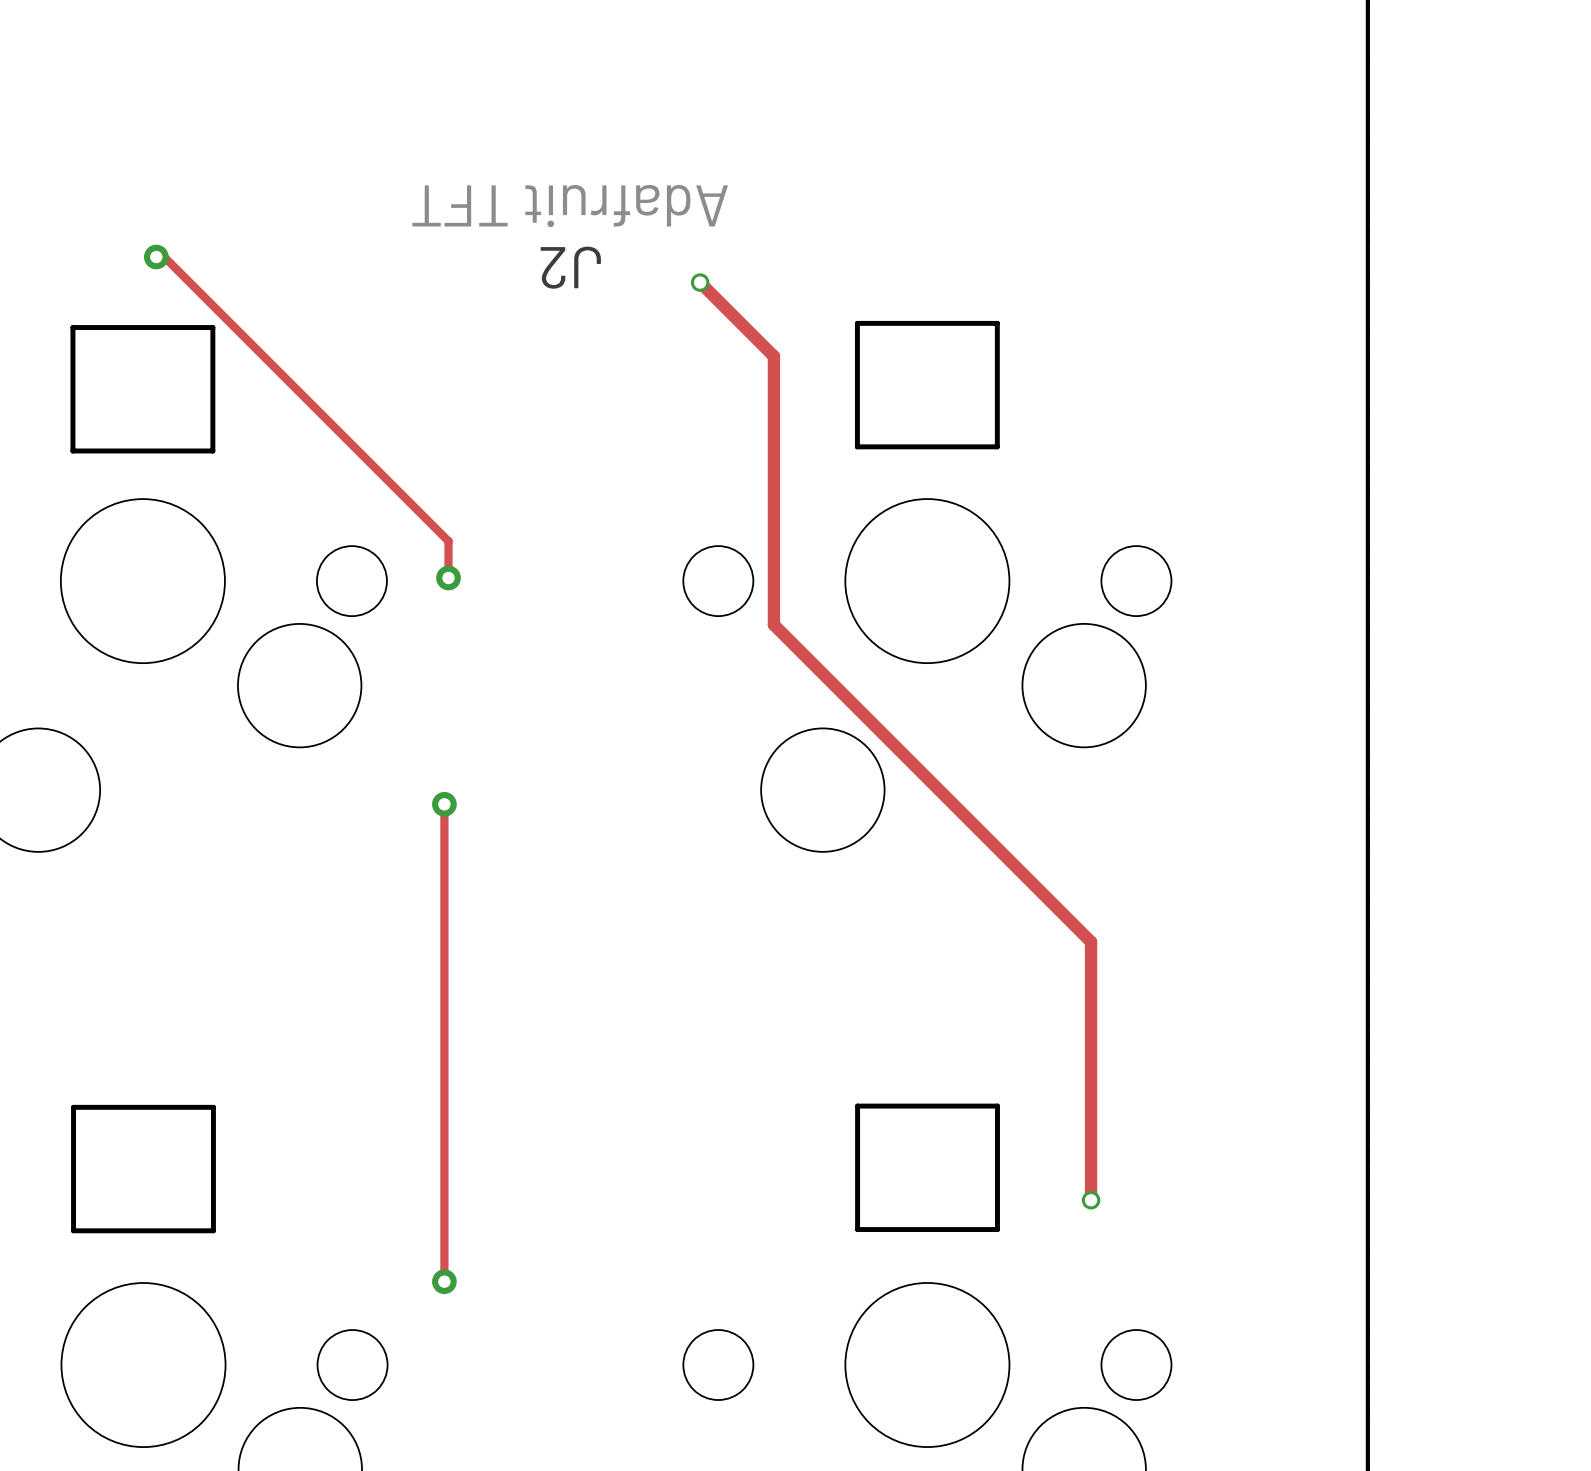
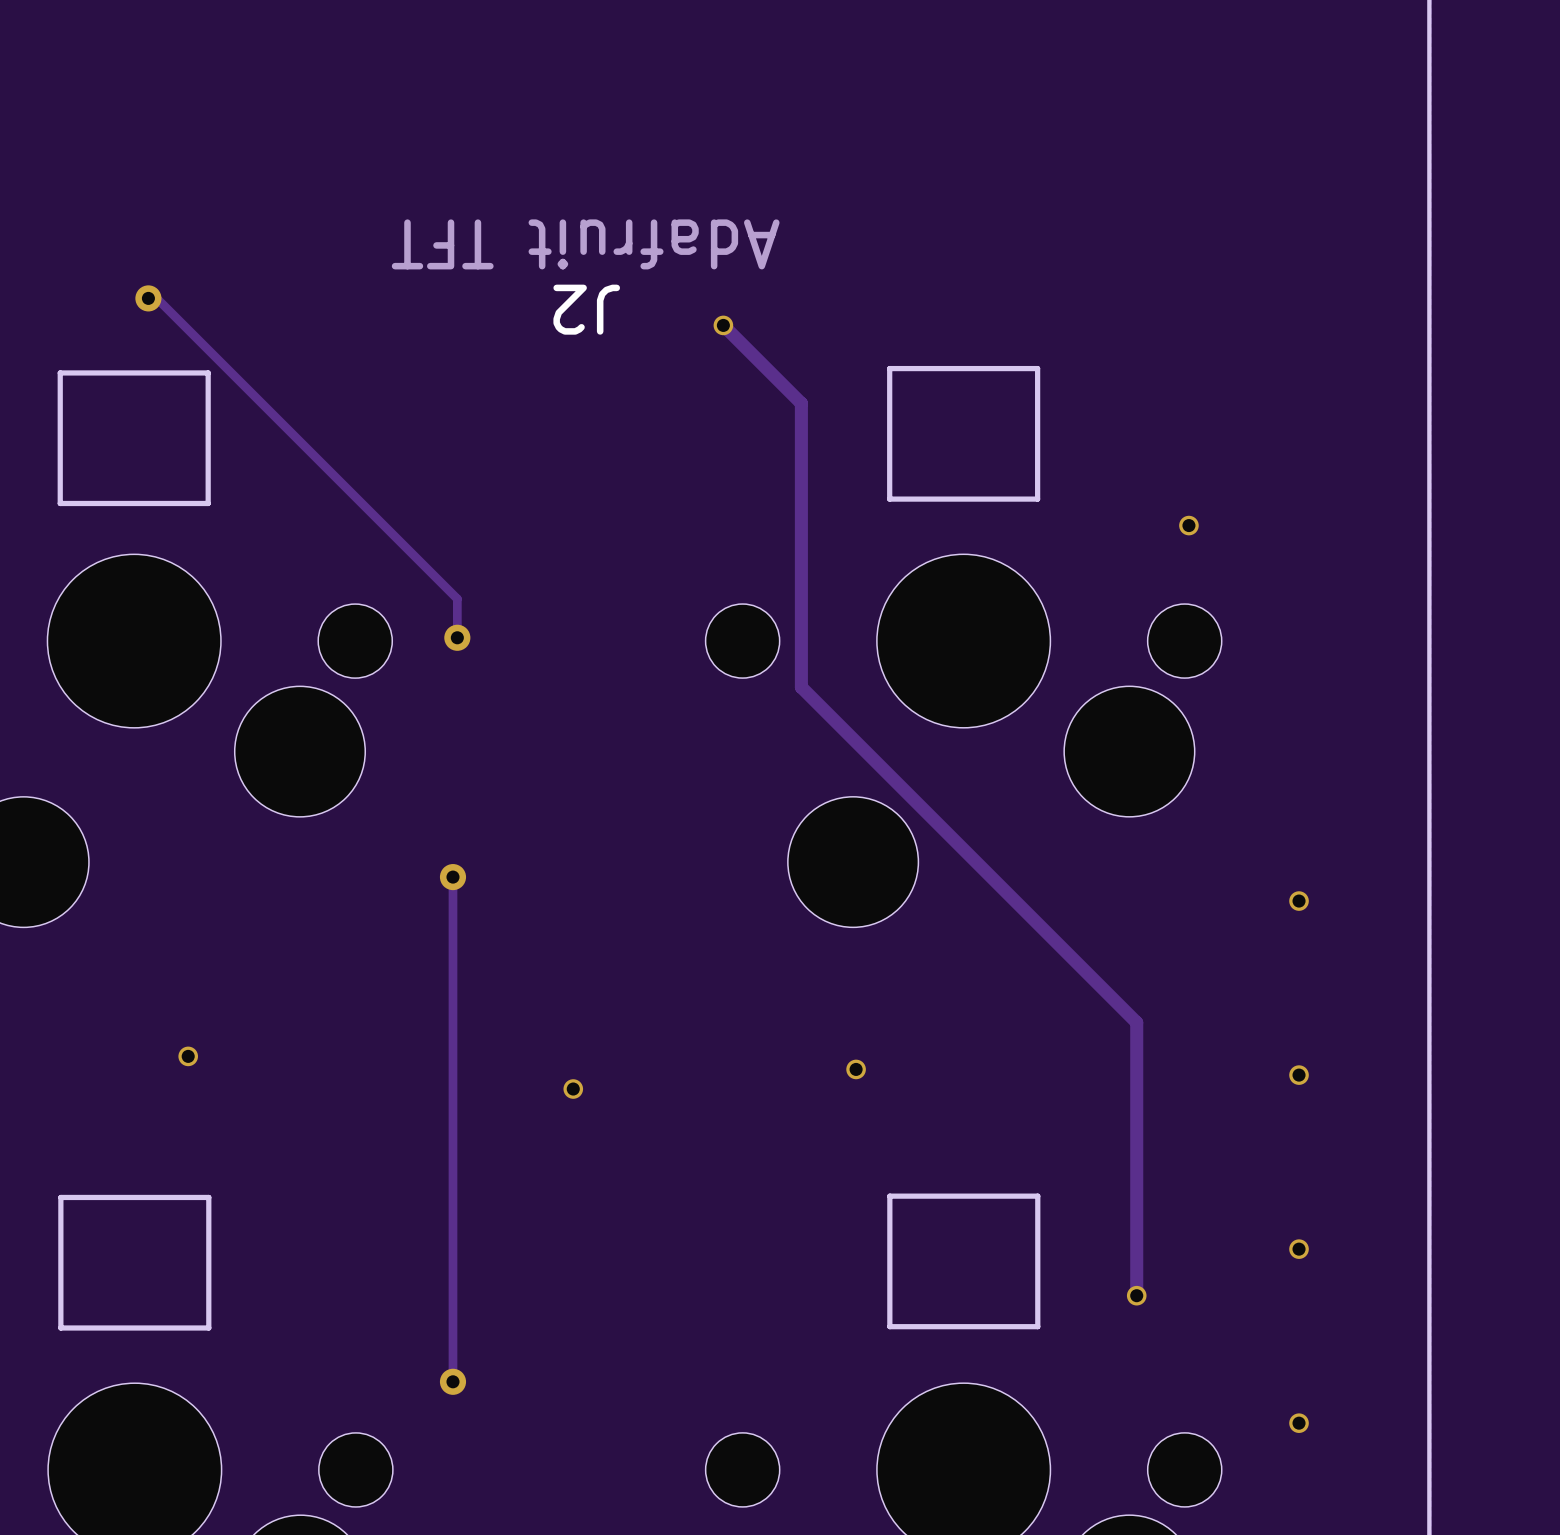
via: none -> (1188, 525)
via: none -> (1299, 901)
via: none -> (188, 1056)
via: none -> (856, 1069)
via: none -> (1299, 1075)
via: none -> (573, 1089)
via: none -> (1299, 1249)
via: none -> (1299, 1423)

